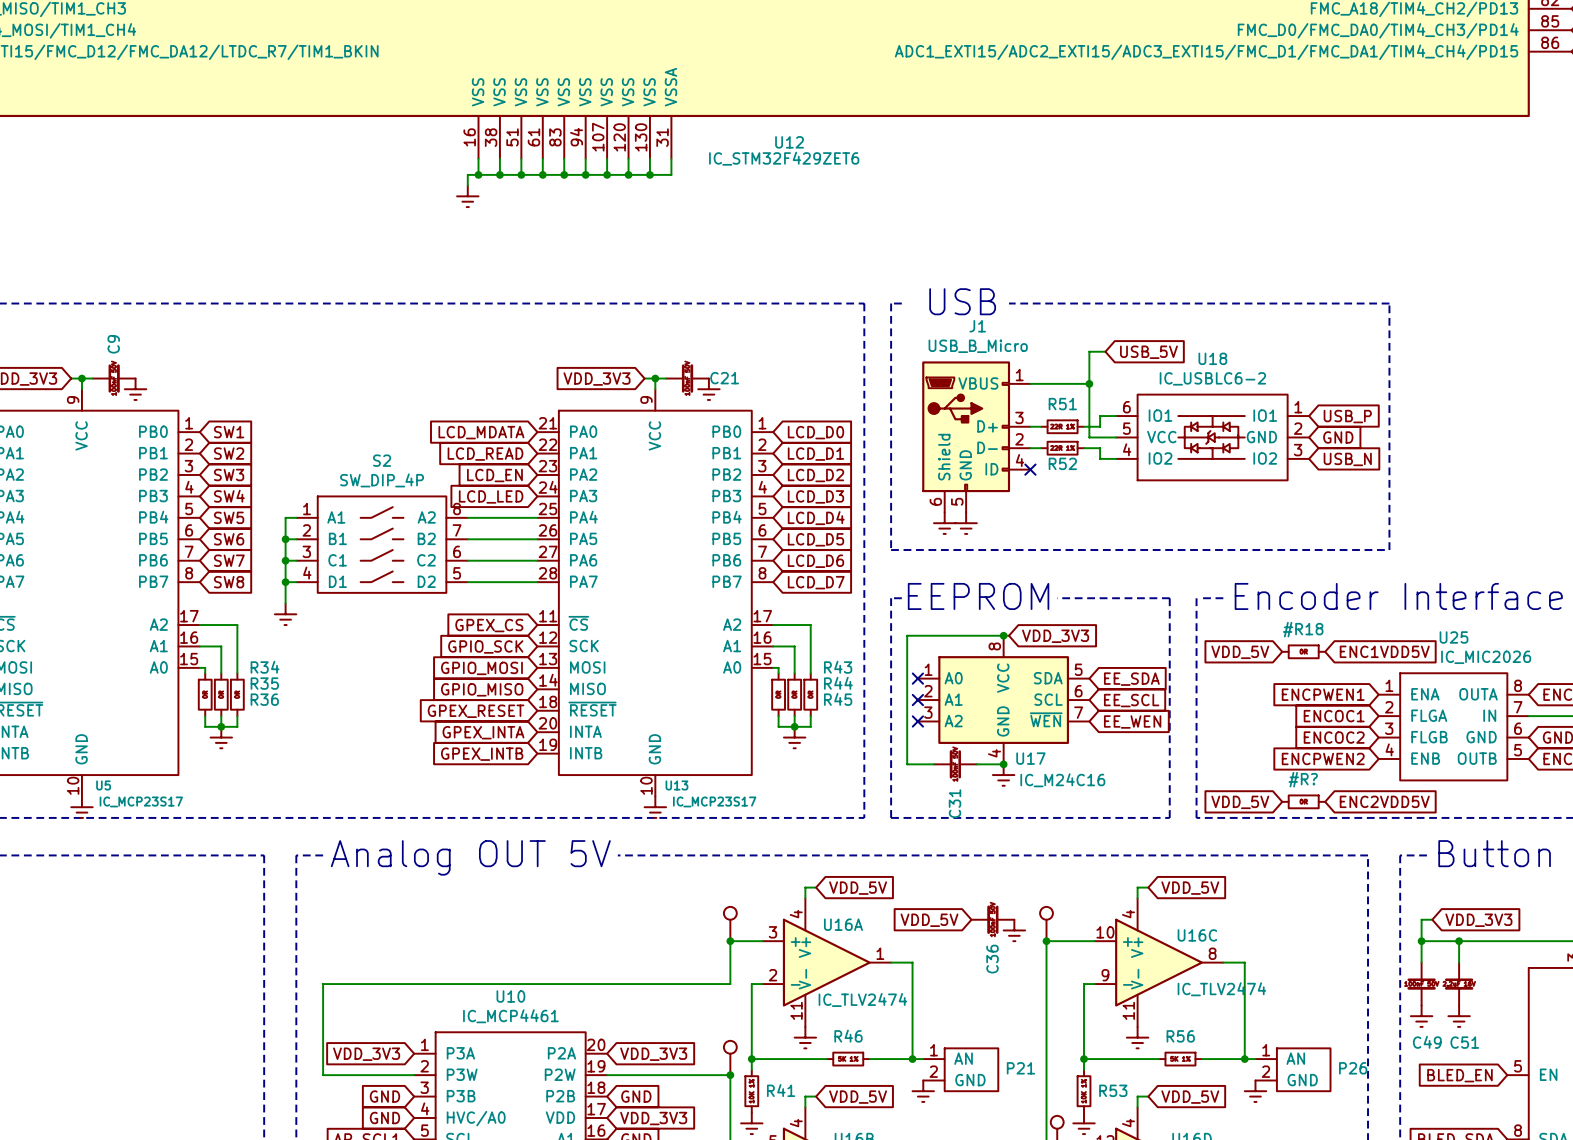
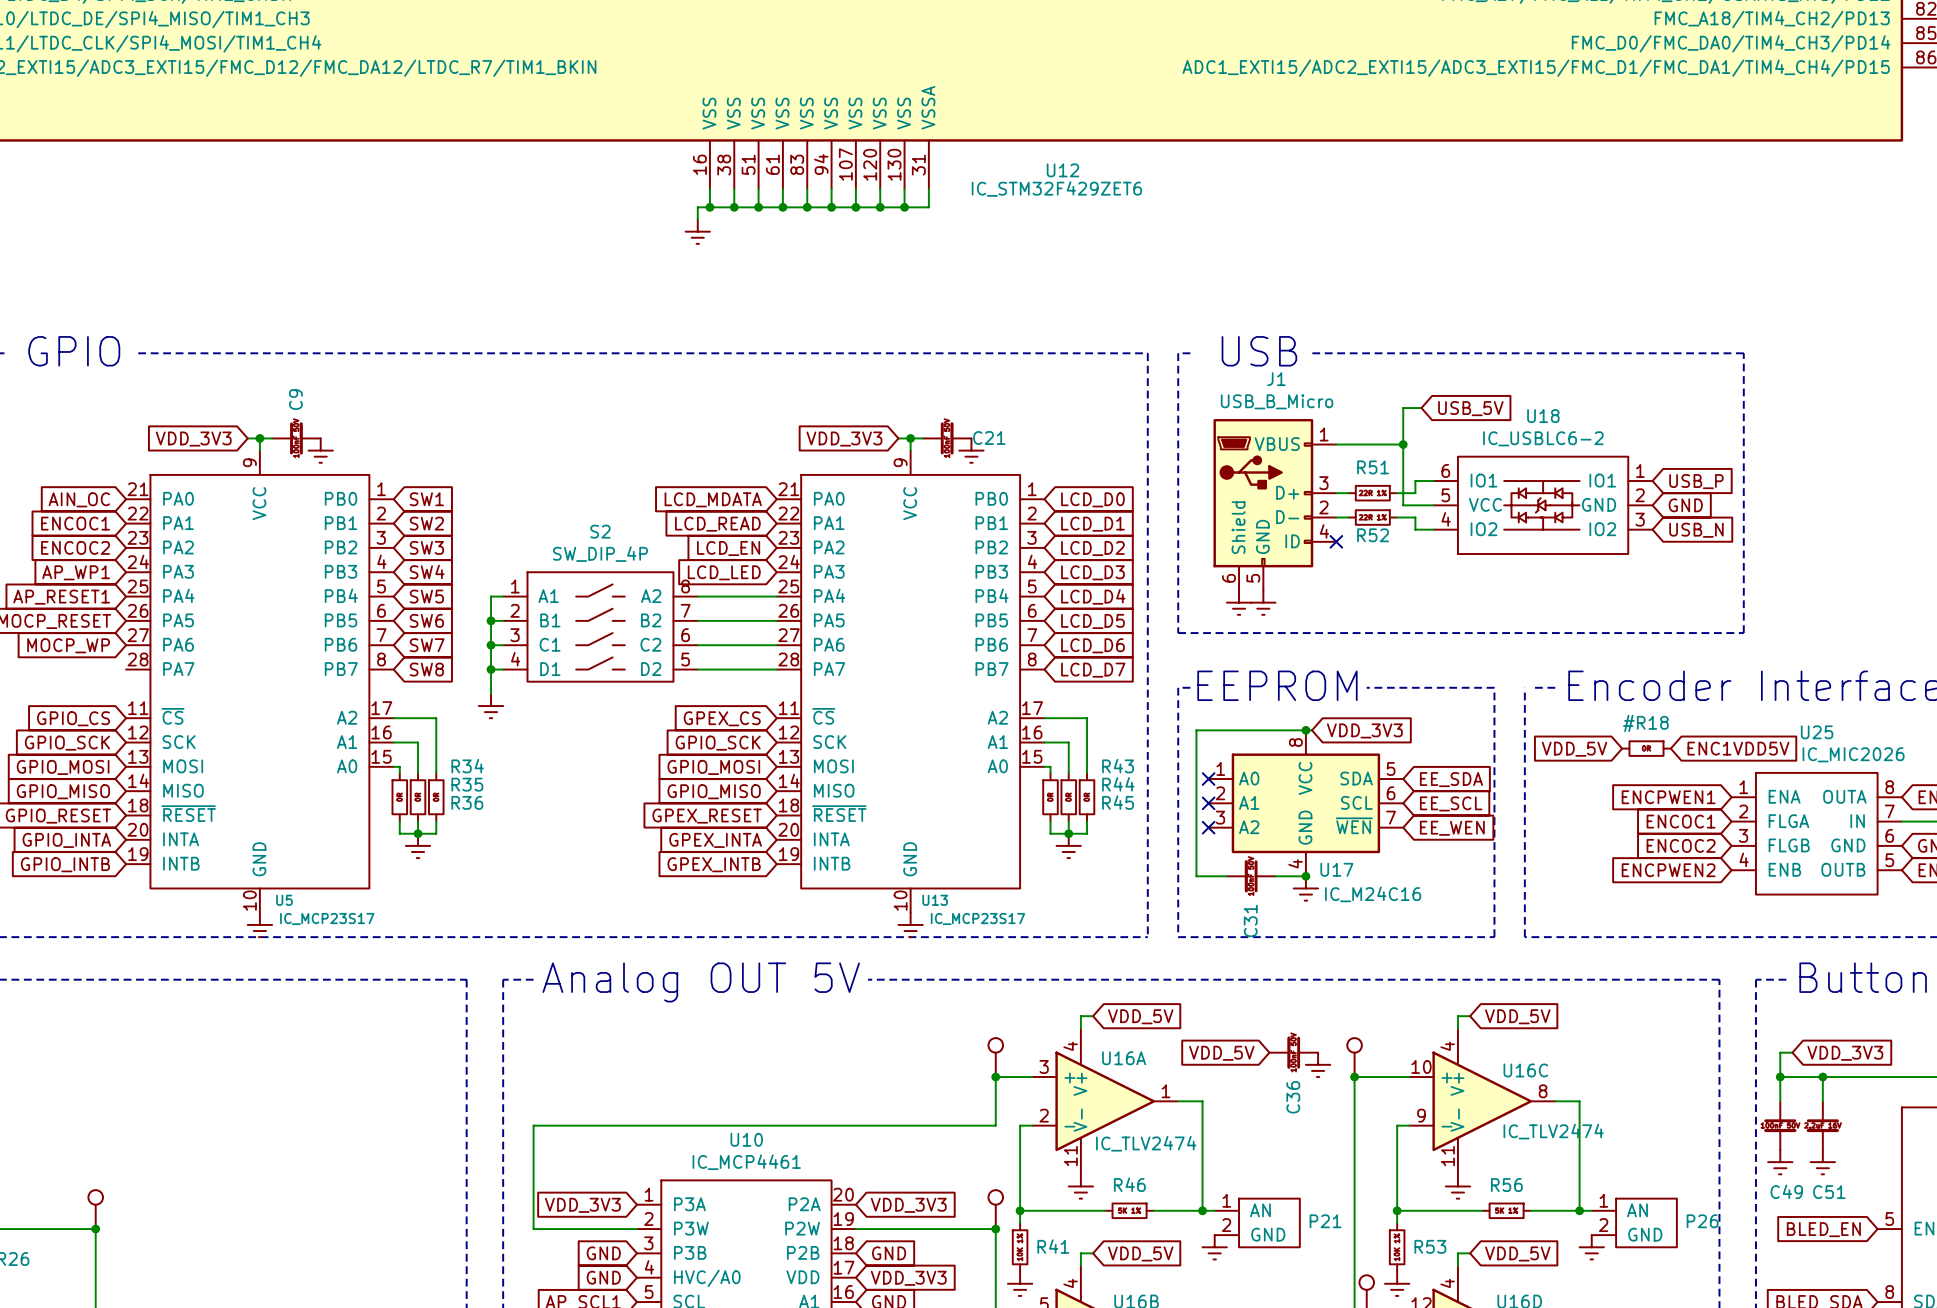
#R?: (1303, 801) -> none
global label: ENC2VDD5V (1384, 801) -> none
global label: VDD_5V (1240, 802) -> none

